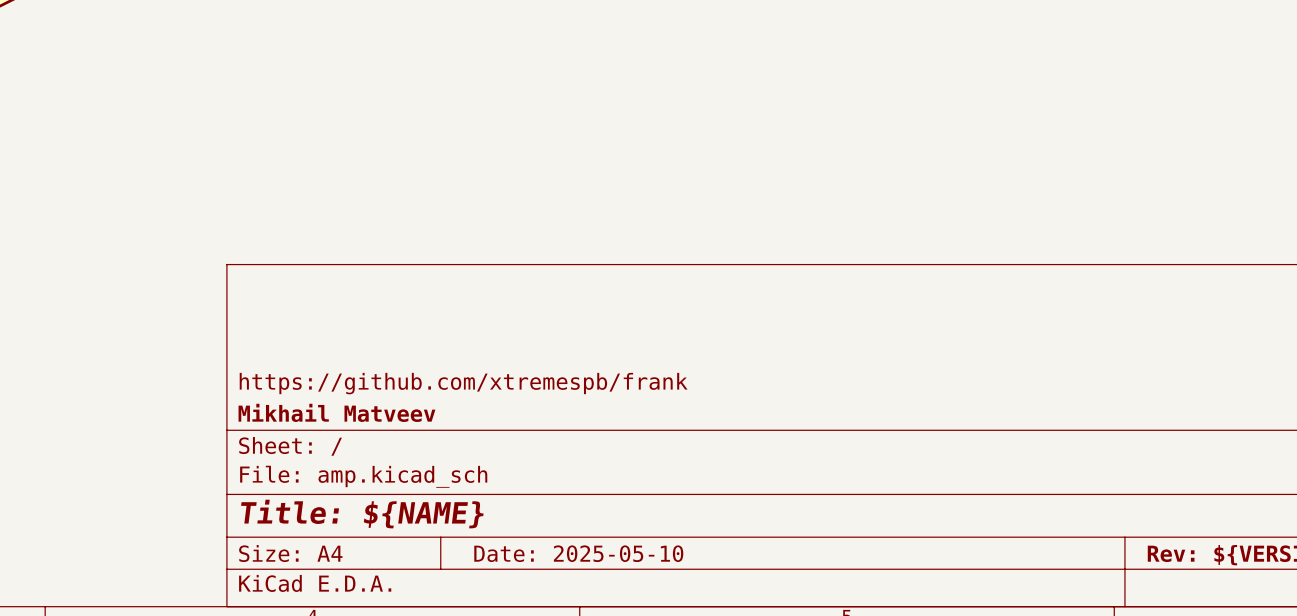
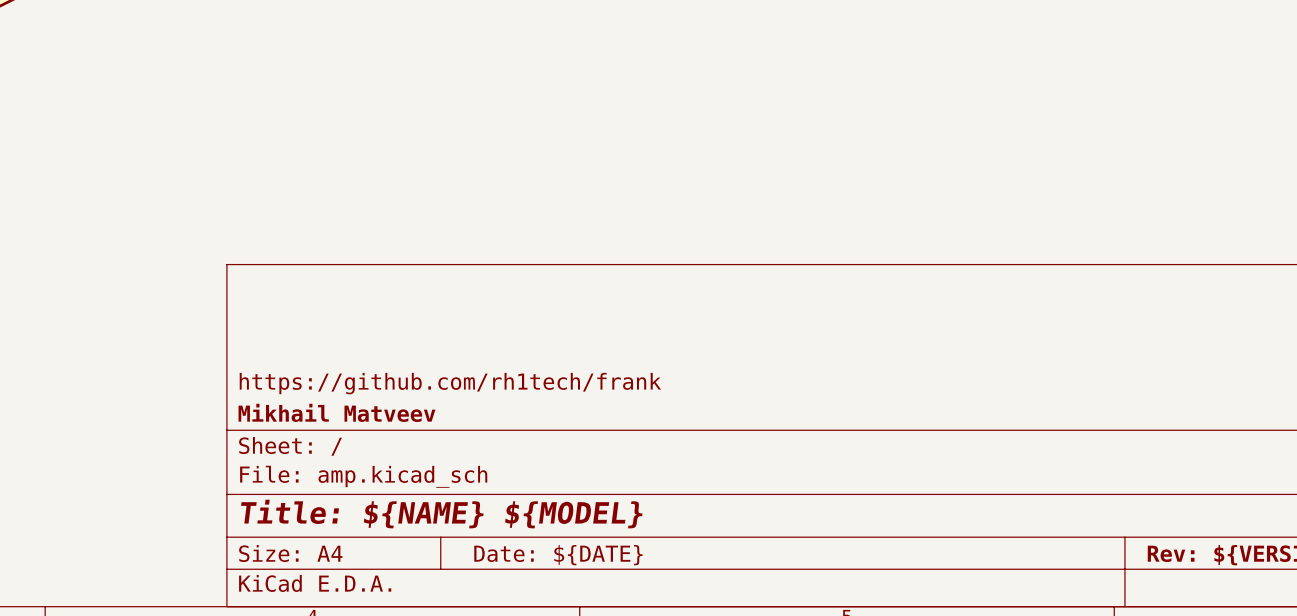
title block: https://github.com/xtremespb/frank (463, 383) -> https://github.com/rh1tech/frank (450, 383)
title block: Title: ${NAME} (362, 514) -> Title: ${NAME} ${MODEL} (441, 514)
title block: Date: 2025-05-10 (578, 553) -> Date: ${DATE} (558, 555)

